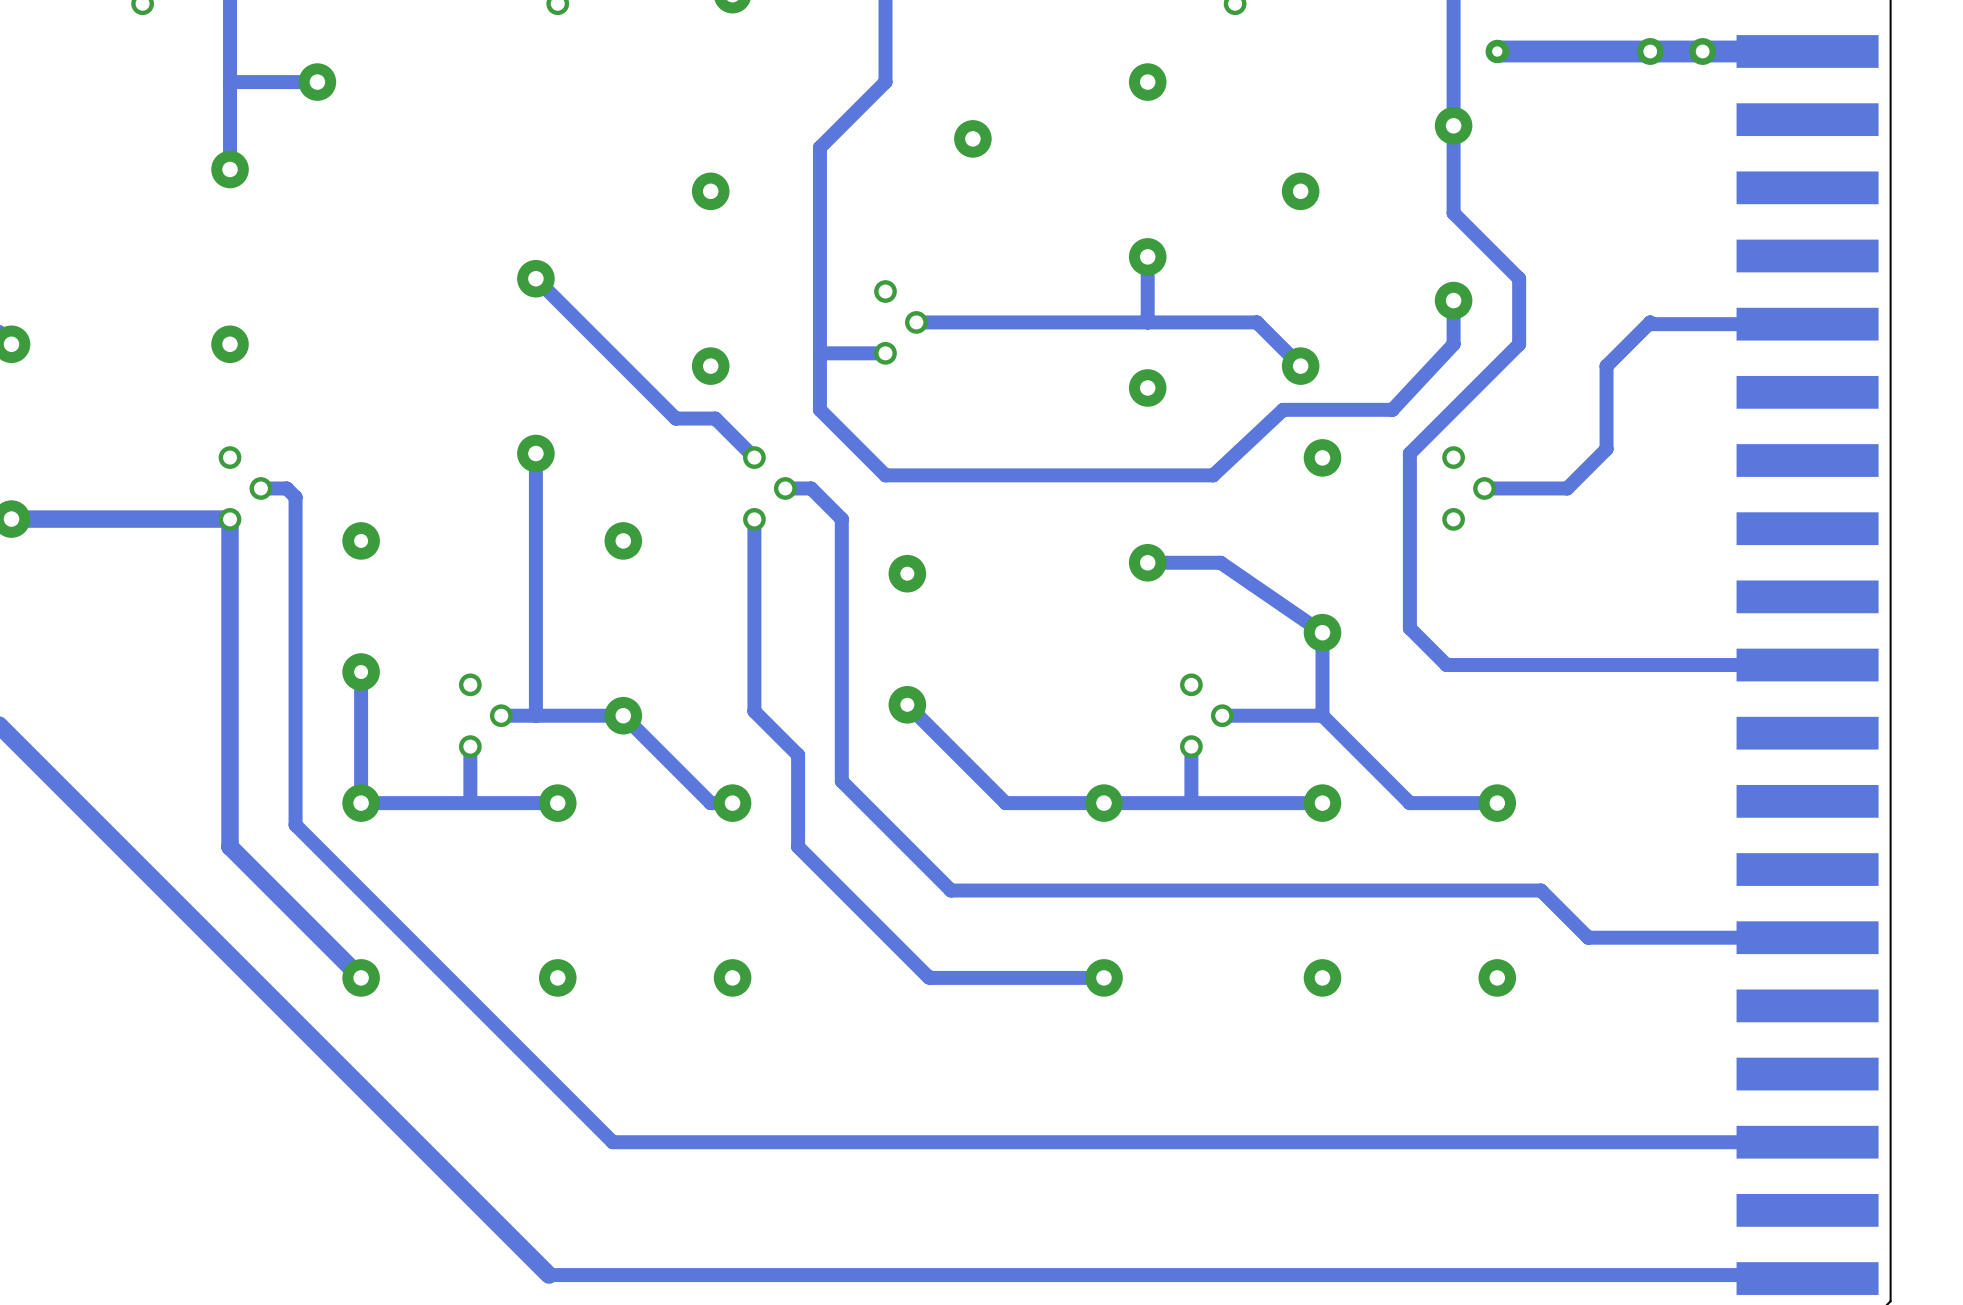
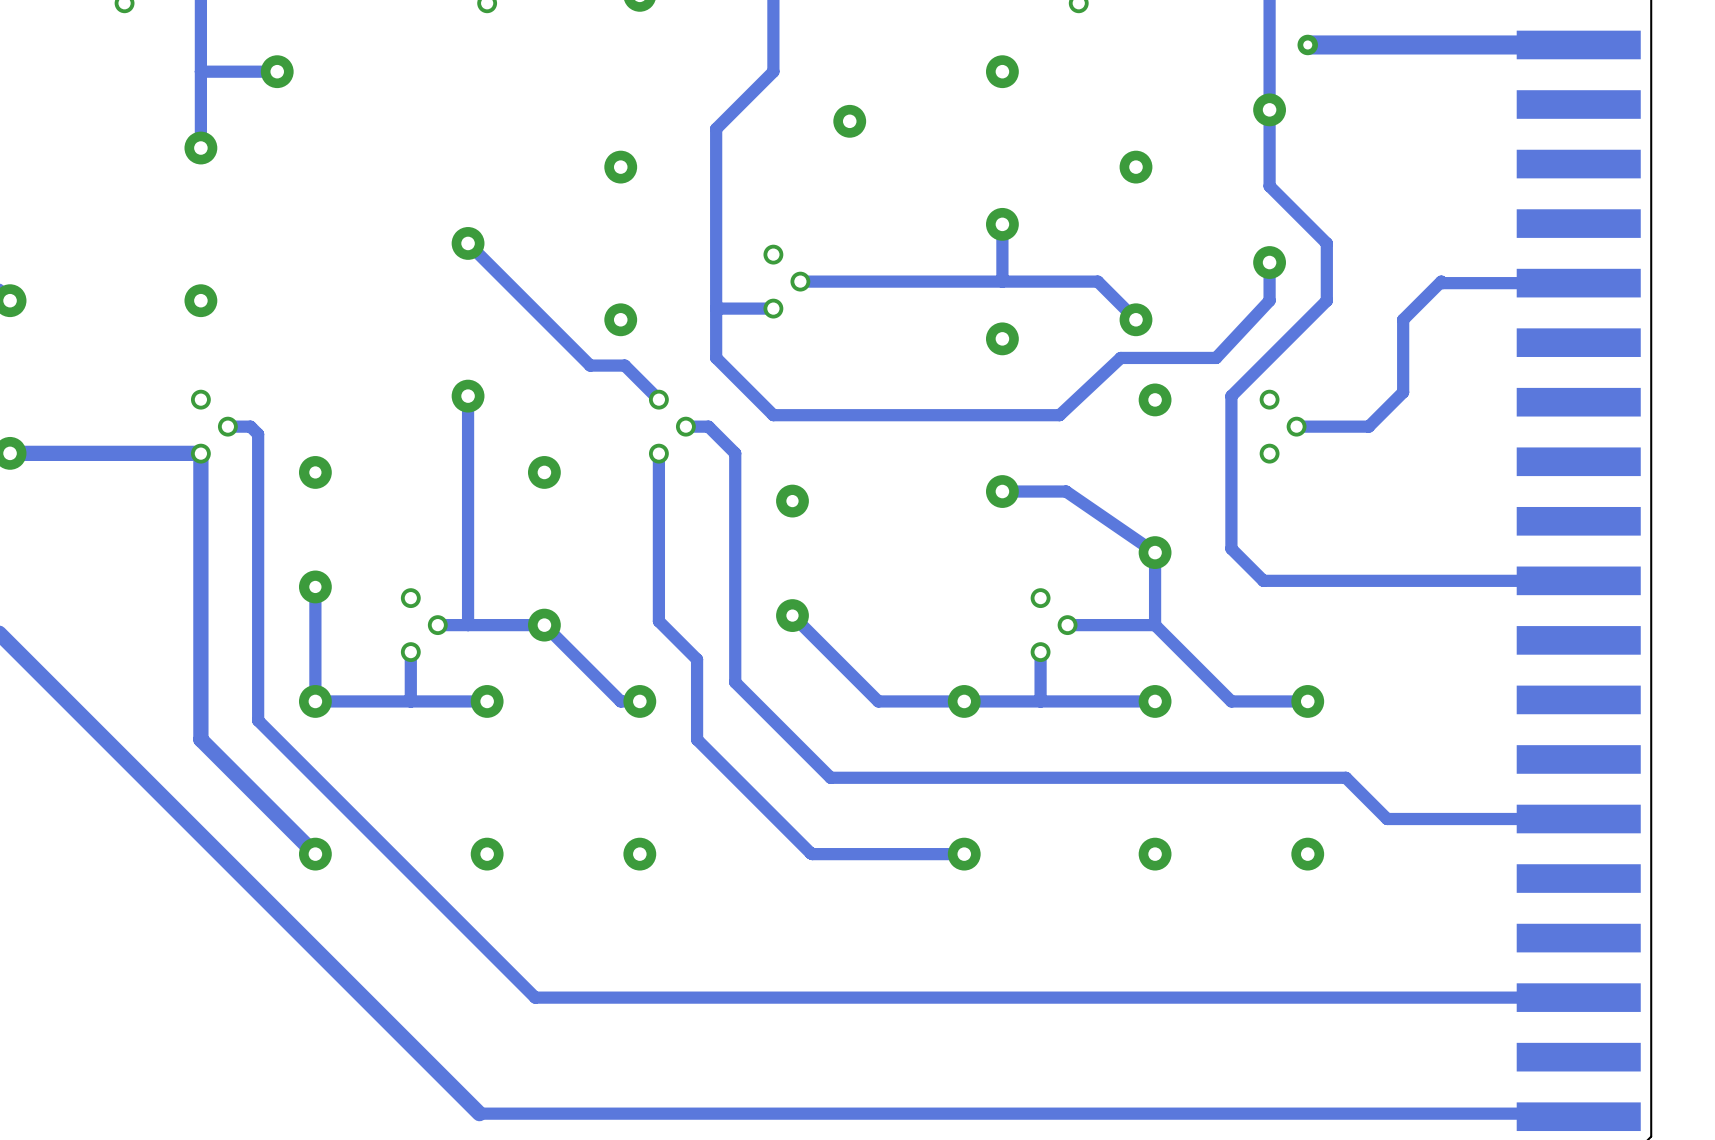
via: (1650, 51) -> none
via: (1702, 51) -> none

